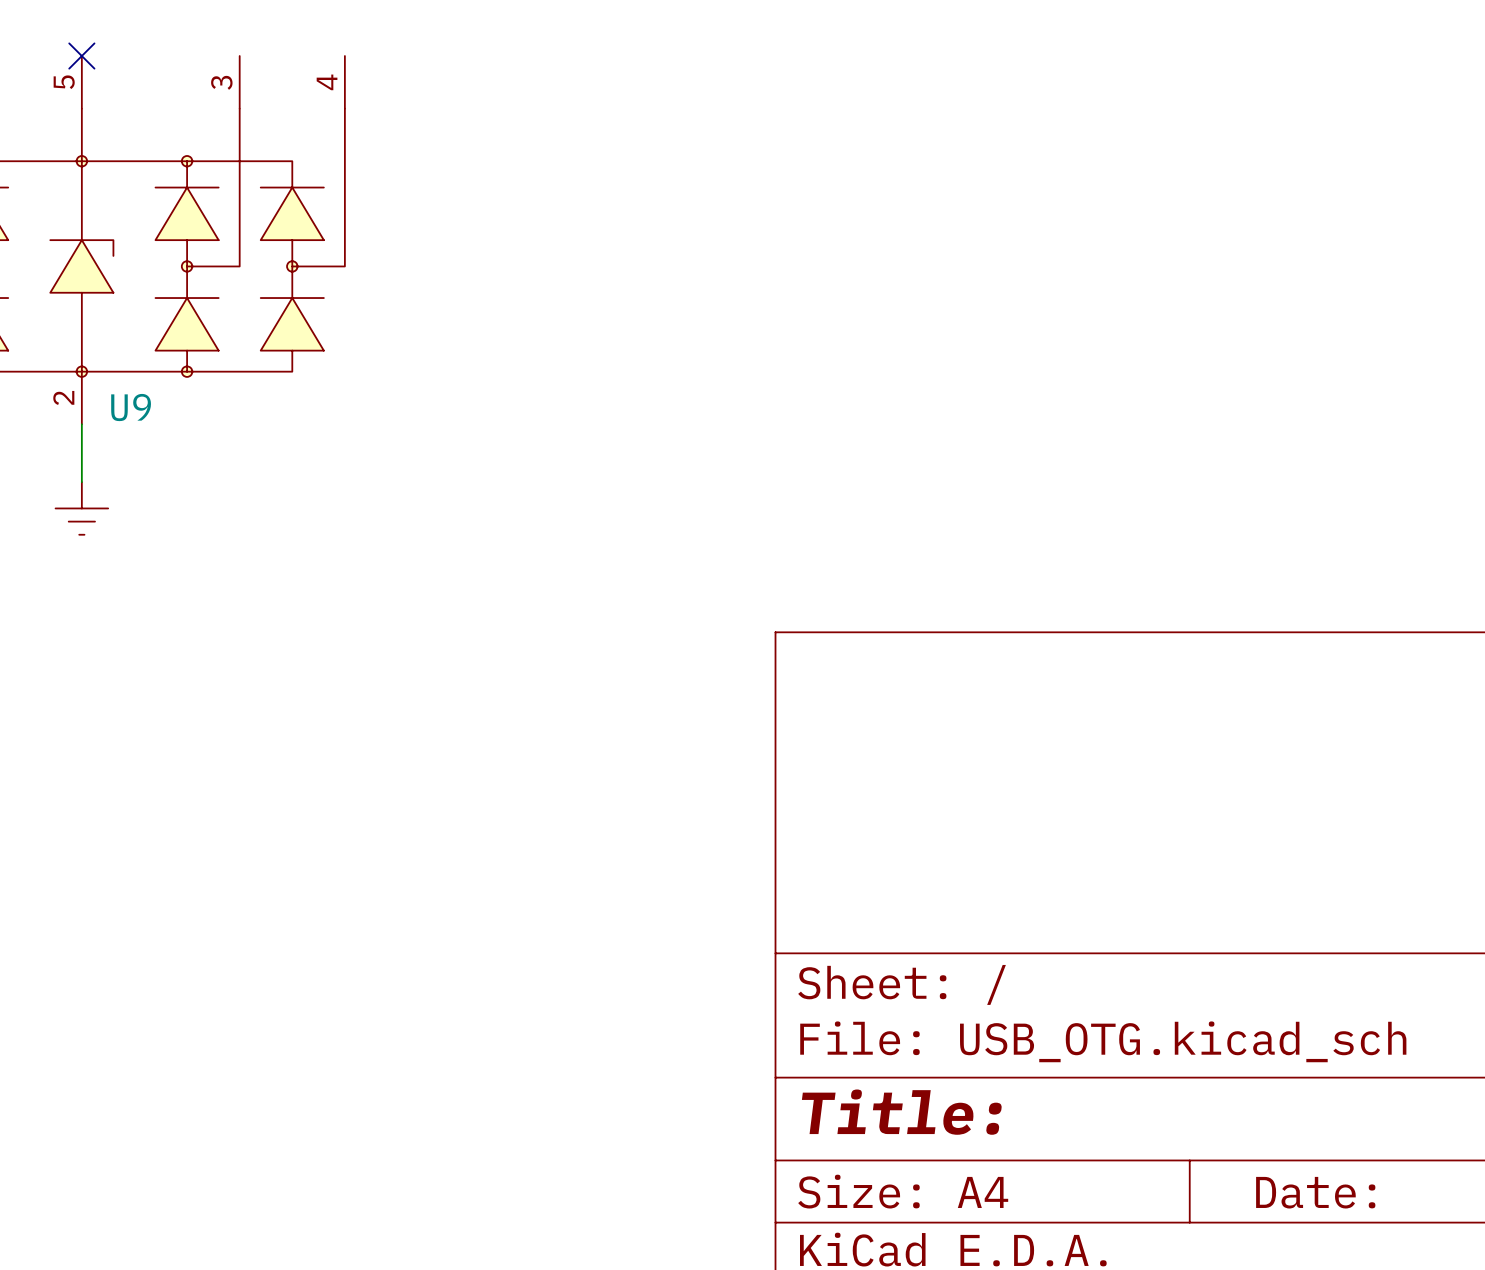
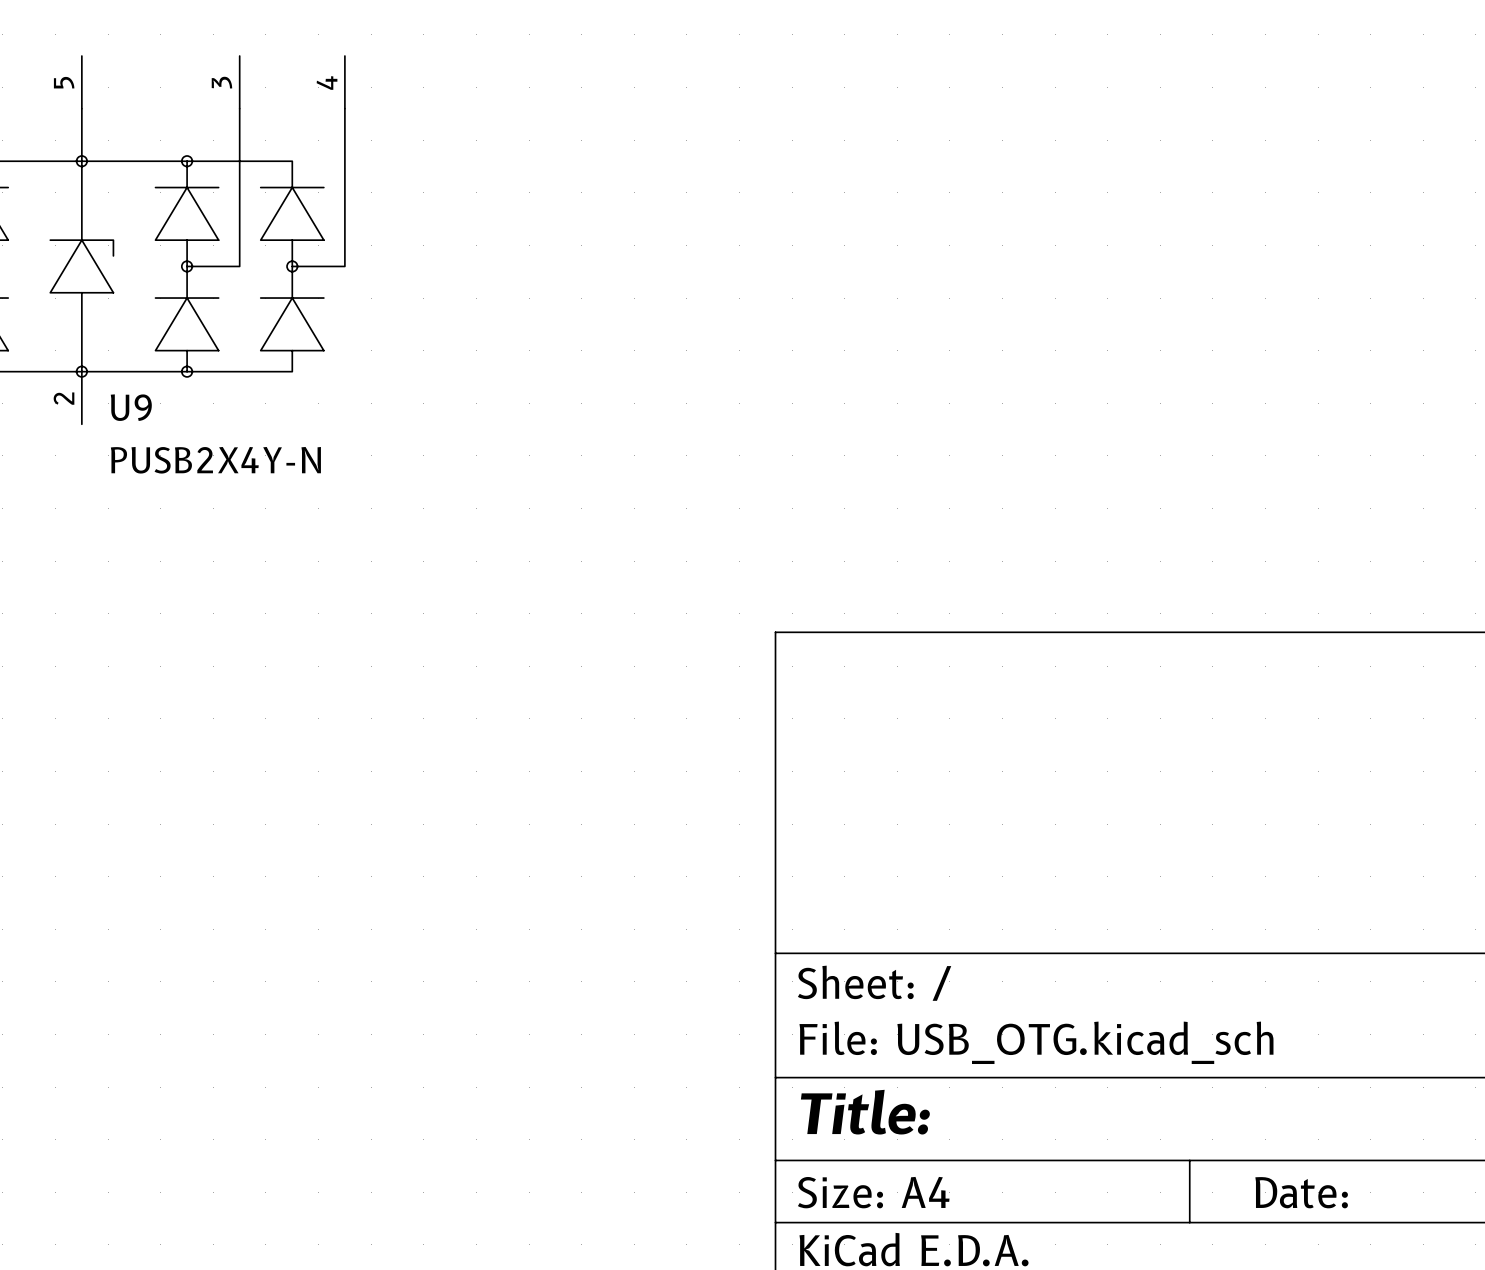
no-connect mark: (81, 56) -> none
wire: (81, 424) (81, 482) -> none
U9 value: none -> PUSB2X4Y-N (215, 460)
power symbol: (81, 508) -> none

